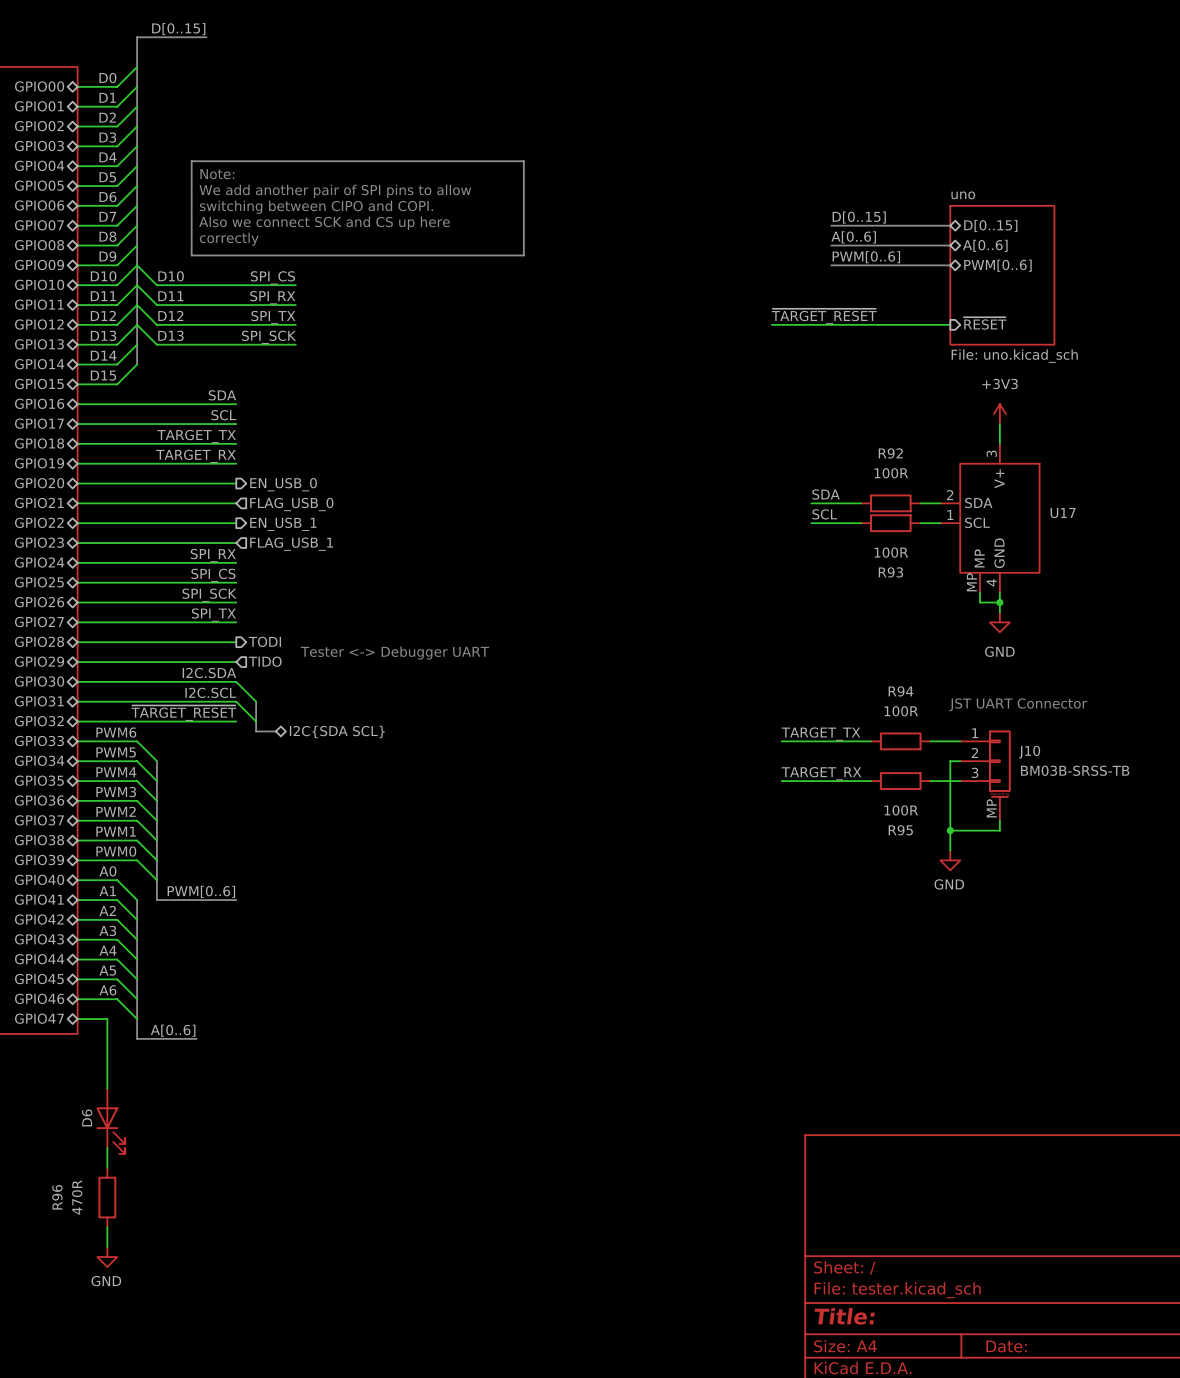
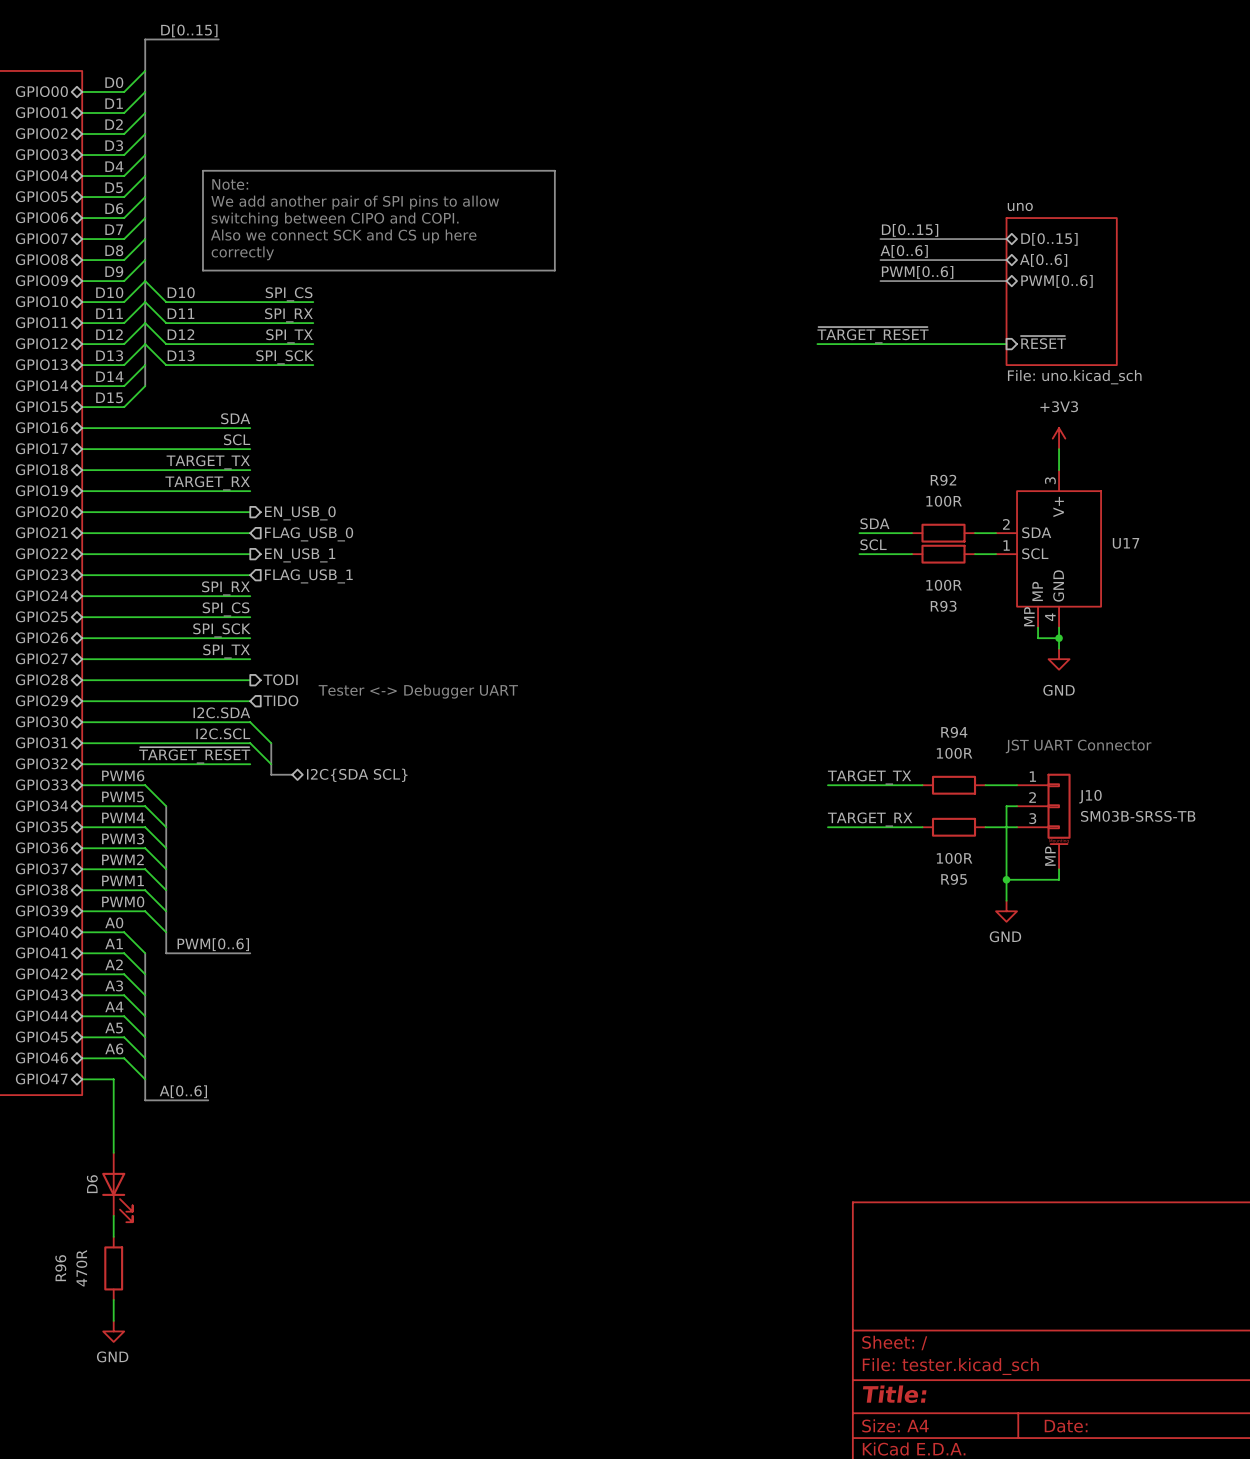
J10 value: BM03B-SRSS-TB (1075, 770) -> SM03B-SRSS-TB (1138, 816)

